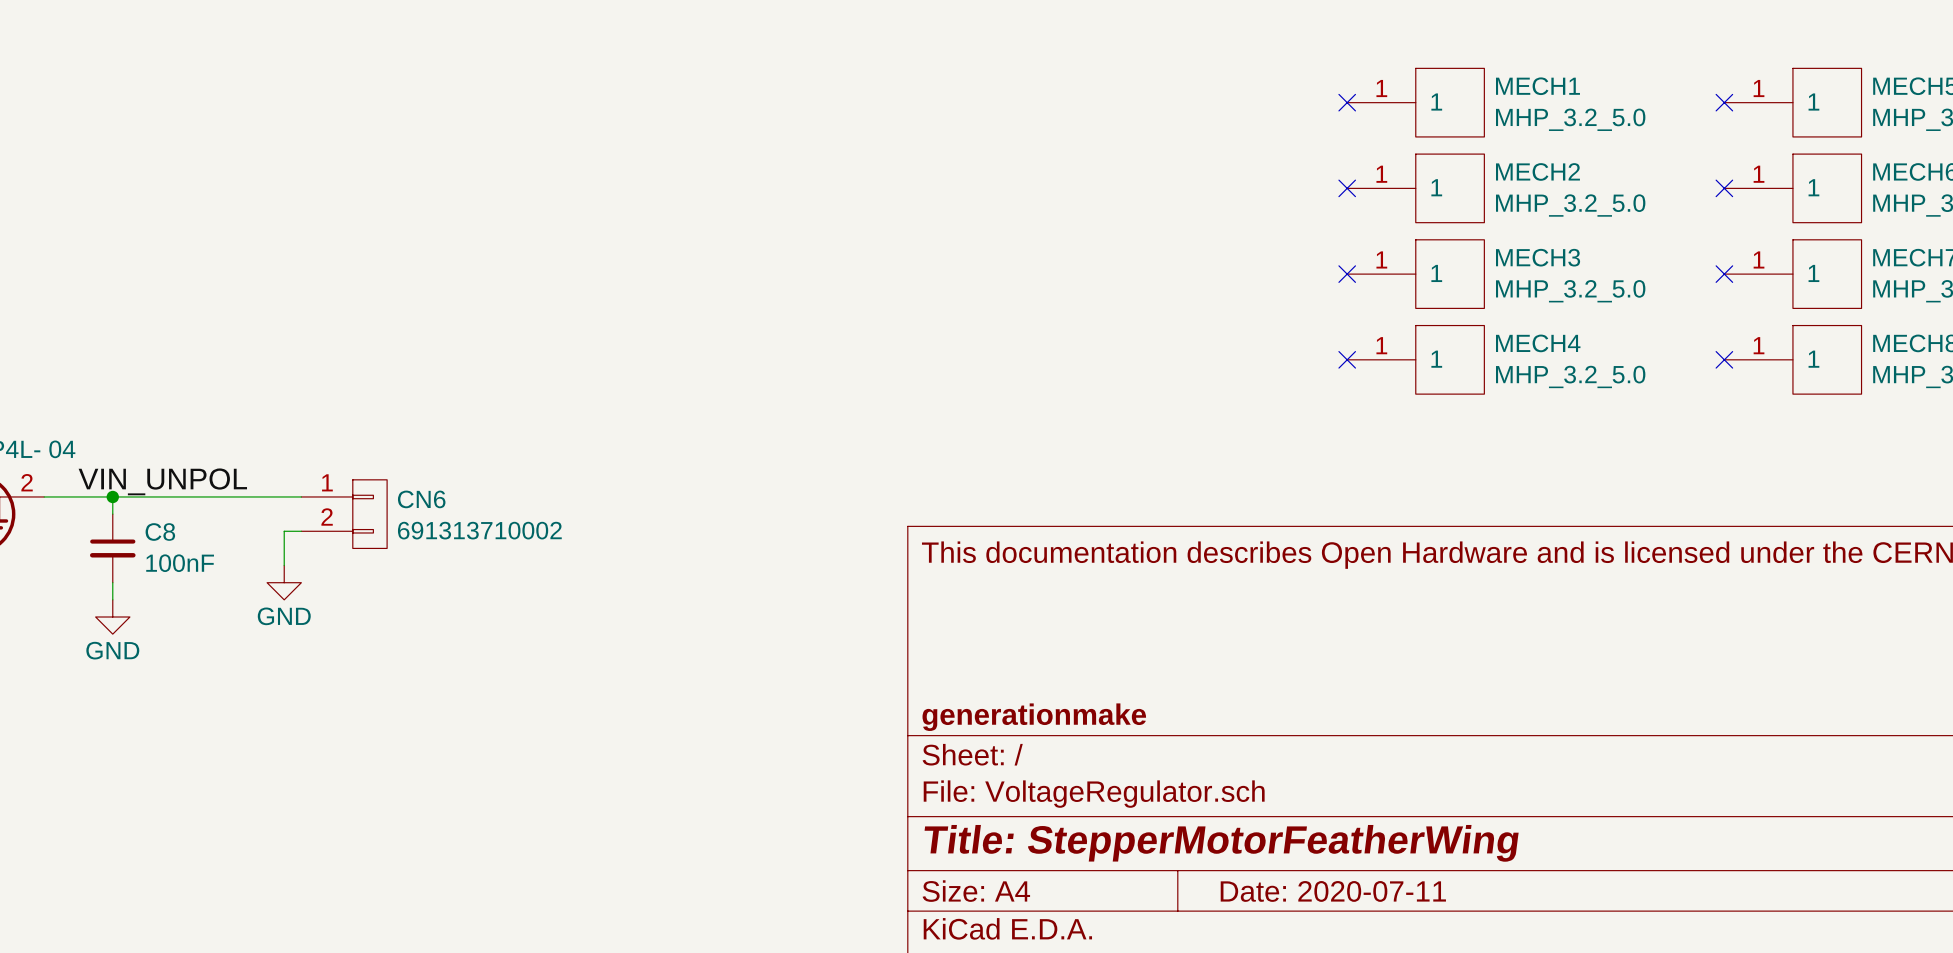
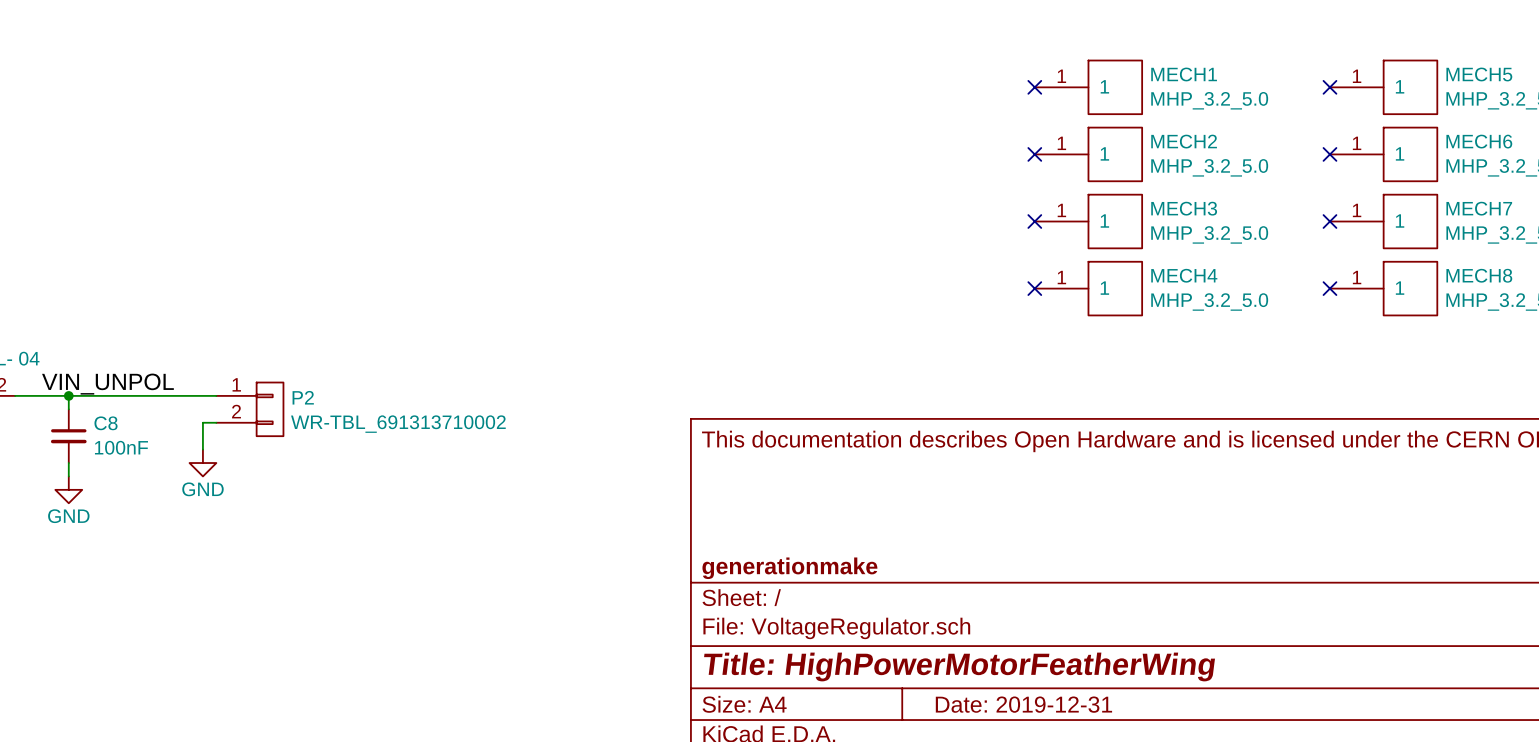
CN6 name: CN6 (421, 499) -> P2 (303, 397)
CN6 value: 691313710002 (479, 530) -> WR-TBL_691313710002 (398, 424)
title block: Title: StepperMotorFeatherWing (1221, 843) -> Title: HighPowerMotorFeatherWing (959, 666)
title block: Date: 2020-07-11 (1333, 891) -> Date: 2019-12-31 (1023, 704)

